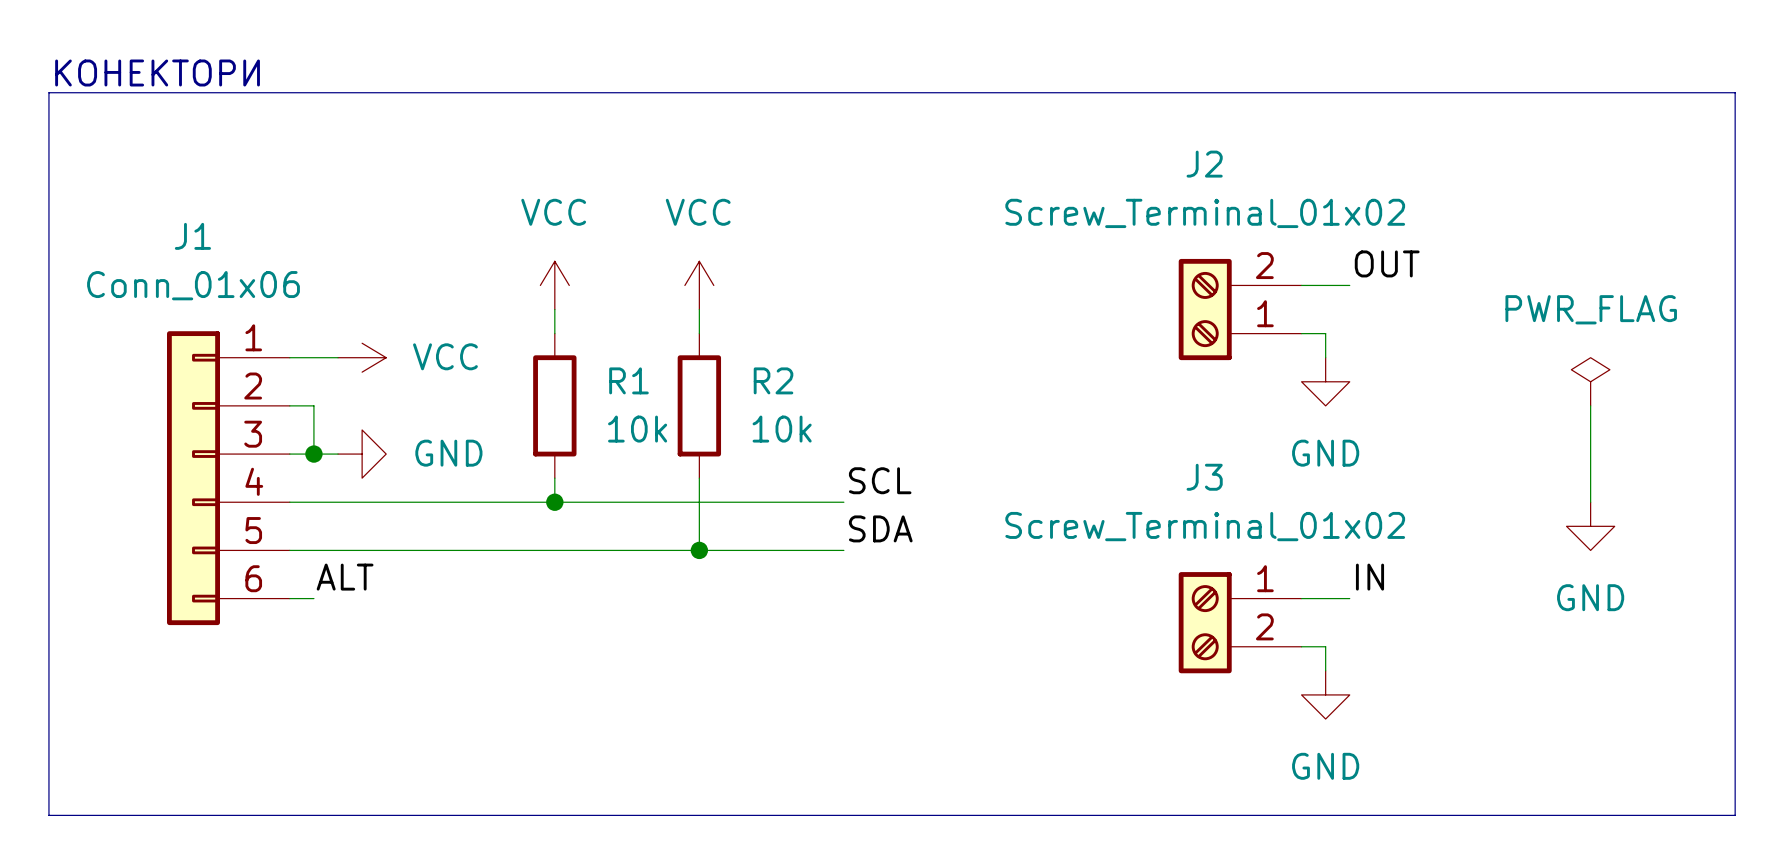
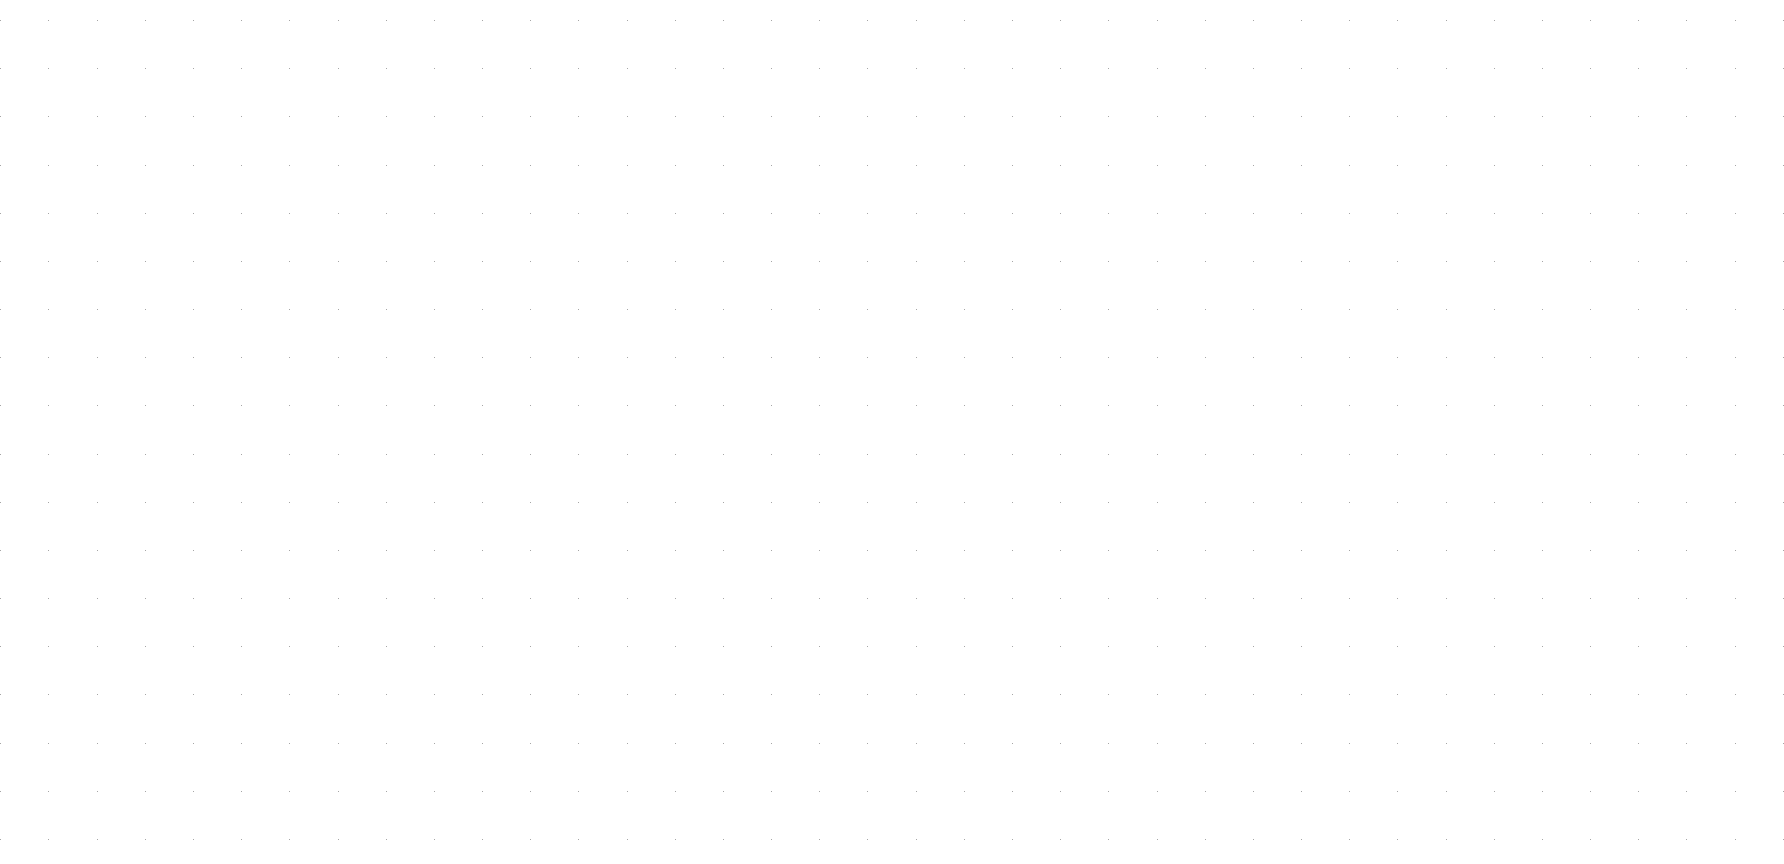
text: КОНЕКТОРИ (157, 73) -> none
line: (48, 92) (48, 815) (1735, 815) (1735, 92) (48, 92) -> none
label: OUT (1387, 263) -> none
power symbol: VCC (554, 285) -> none
power symbol: VCC (699, 285) -> none
wire: (1301, 285) (1349, 285) -> none
wire: (554, 309) (554, 333) -> none
wire: (699, 309) (699, 333) -> none
J2: Screw_Terminal_01x02 (1240, 309) -> none
wire: (1301, 333) (1325, 333) (1325, 357) -> none
wire: (289, 357) (338, 357) -> none
power symbol: VCC (362, 357) -> none
power symbol: GND (1325, 381) -> none
power symbol: PWR_FLAG (1590, 381) -> none
wire: (289, 405) (313, 405) (313, 454) -> none
R1: 10k (554, 405) -> none
R2: 10k (699, 405) -> none
wire: (1590, 405) (1590, 502) -> none
wire: (289, 454) (338, 454) -> none
junction: (313, 454) -> none
power symbol: GND (362, 454) -> none
J1: Conn_01x06 (228, 478) -> none
wire: (554, 478) (554, 502) -> none
wire: (699, 478) (699, 550) -> none
label: SCL (880, 480) -> none
wire: (289, 502) (843, 502) -> none
junction: (554, 502) -> none
power symbol: GND (1590, 526) -> none
label: SDA (880, 528) -> none
wire: (289, 550) (843, 550) -> none
junction: (699, 550) -> none
label: ALT (345, 577) -> none
label: IN (1370, 577) -> none
wire: (289, 598) (313, 598) -> none
wire: (1301, 598) (1349, 598) -> none
J3: Screw_Terminal_01x02 (1240, 622) -> none
wire: (1301, 646) (1325, 646) (1325, 670) -> none
power symbol: GND (1325, 694) -> none

